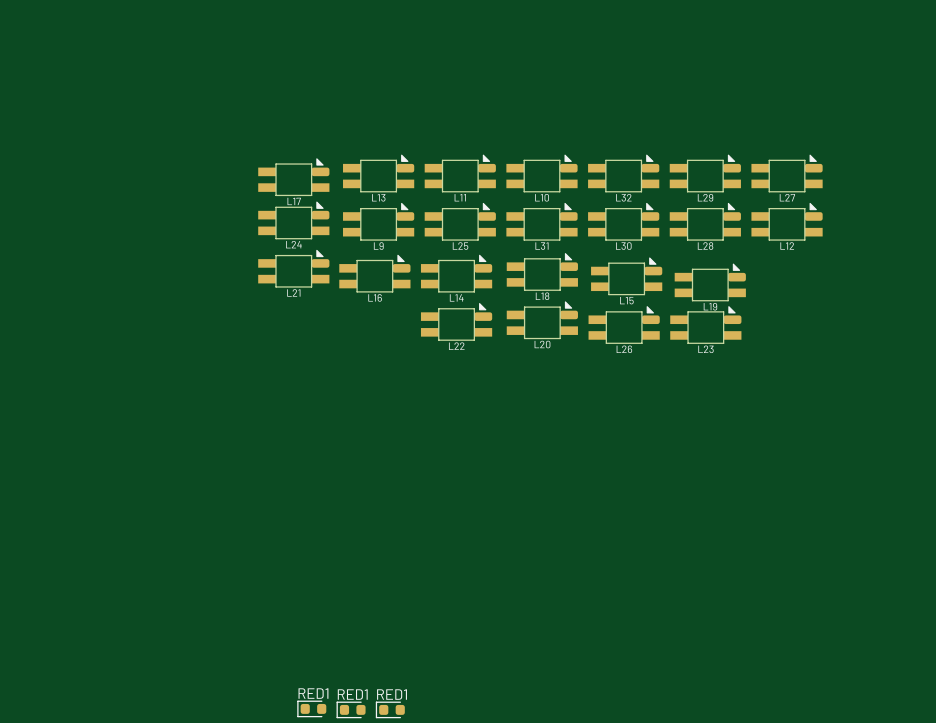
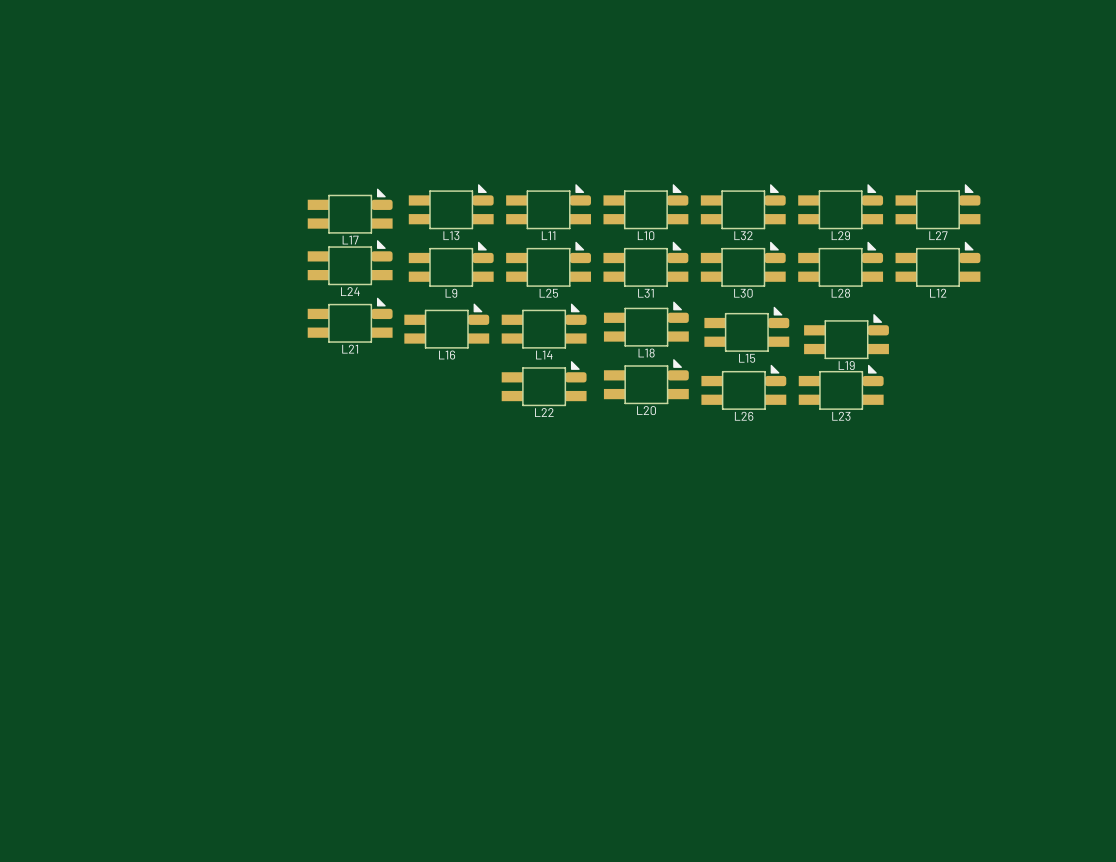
RED1: (311, 708) -> none
RED1: (351, 709) -> none
RED1: (390, 709) -> none

